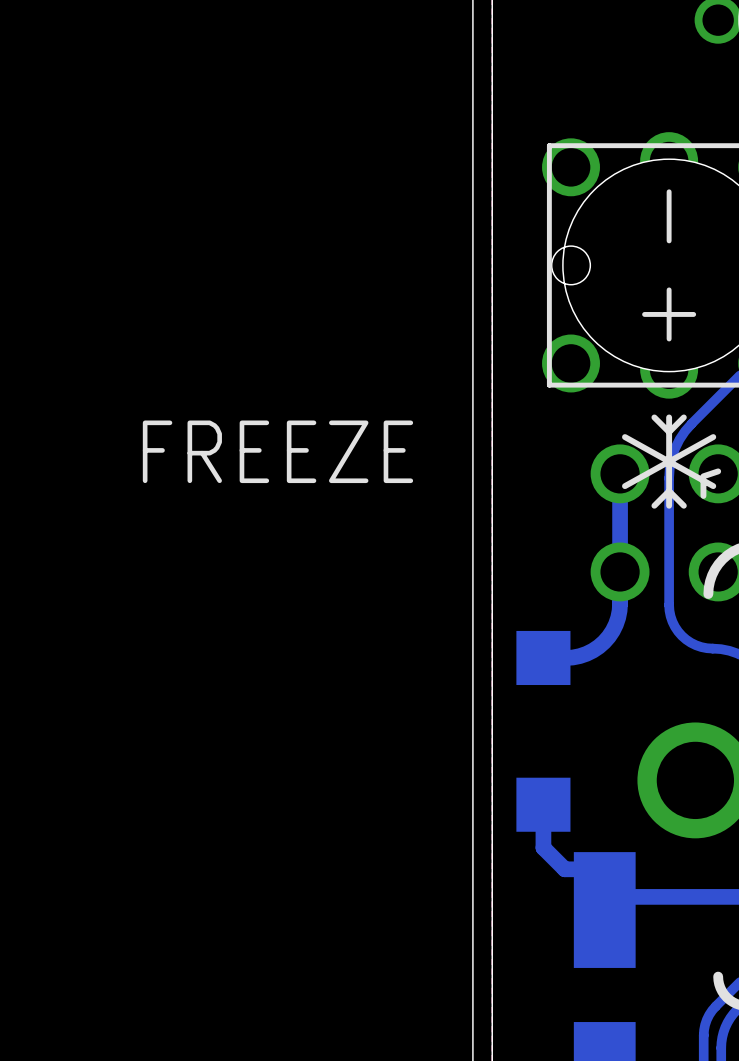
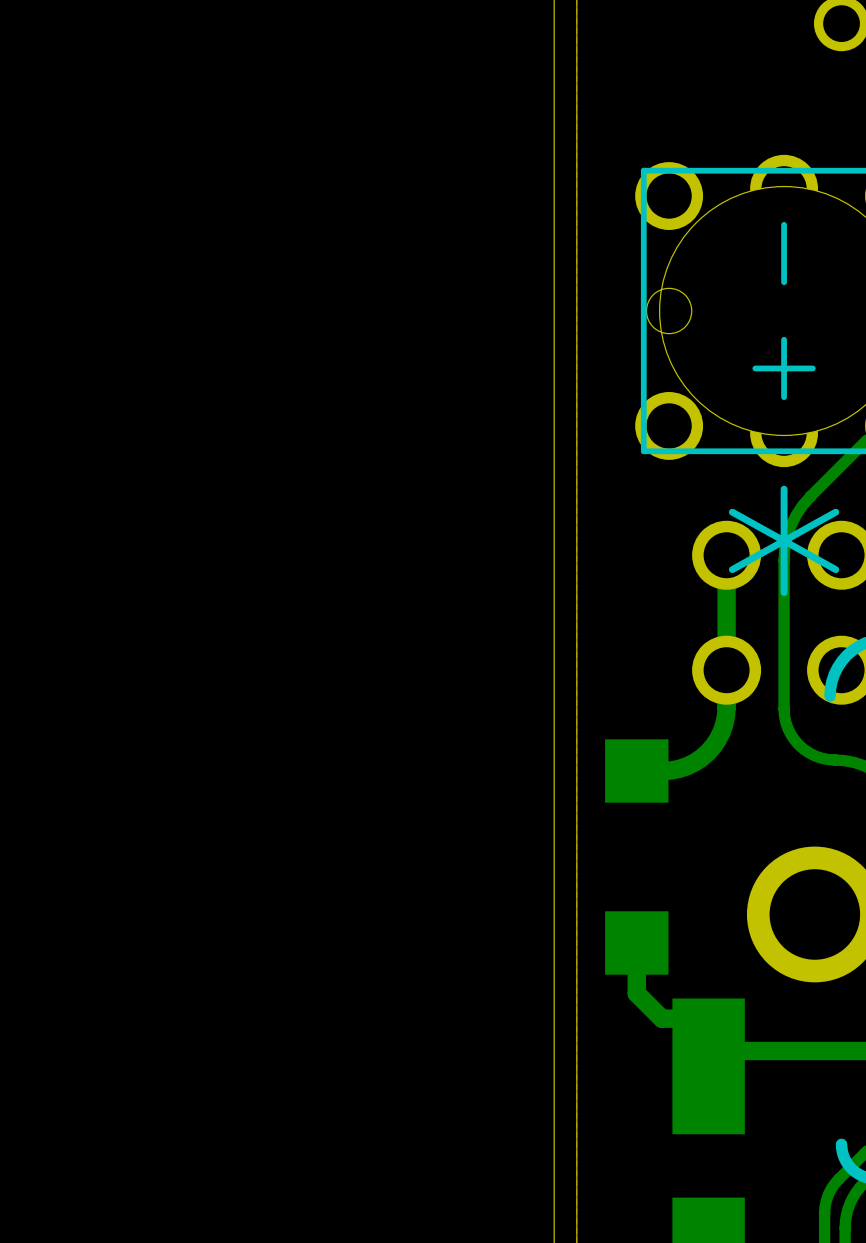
line: (654, 417) (669, 432) (683, 417) -> none
text: FREEZE (277, 451) -> none
line: (718, 471) (703, 476) -> none
line: (703, 481) (703, 495) -> none
line: (654, 505) (669, 491) (683, 505) -> none

